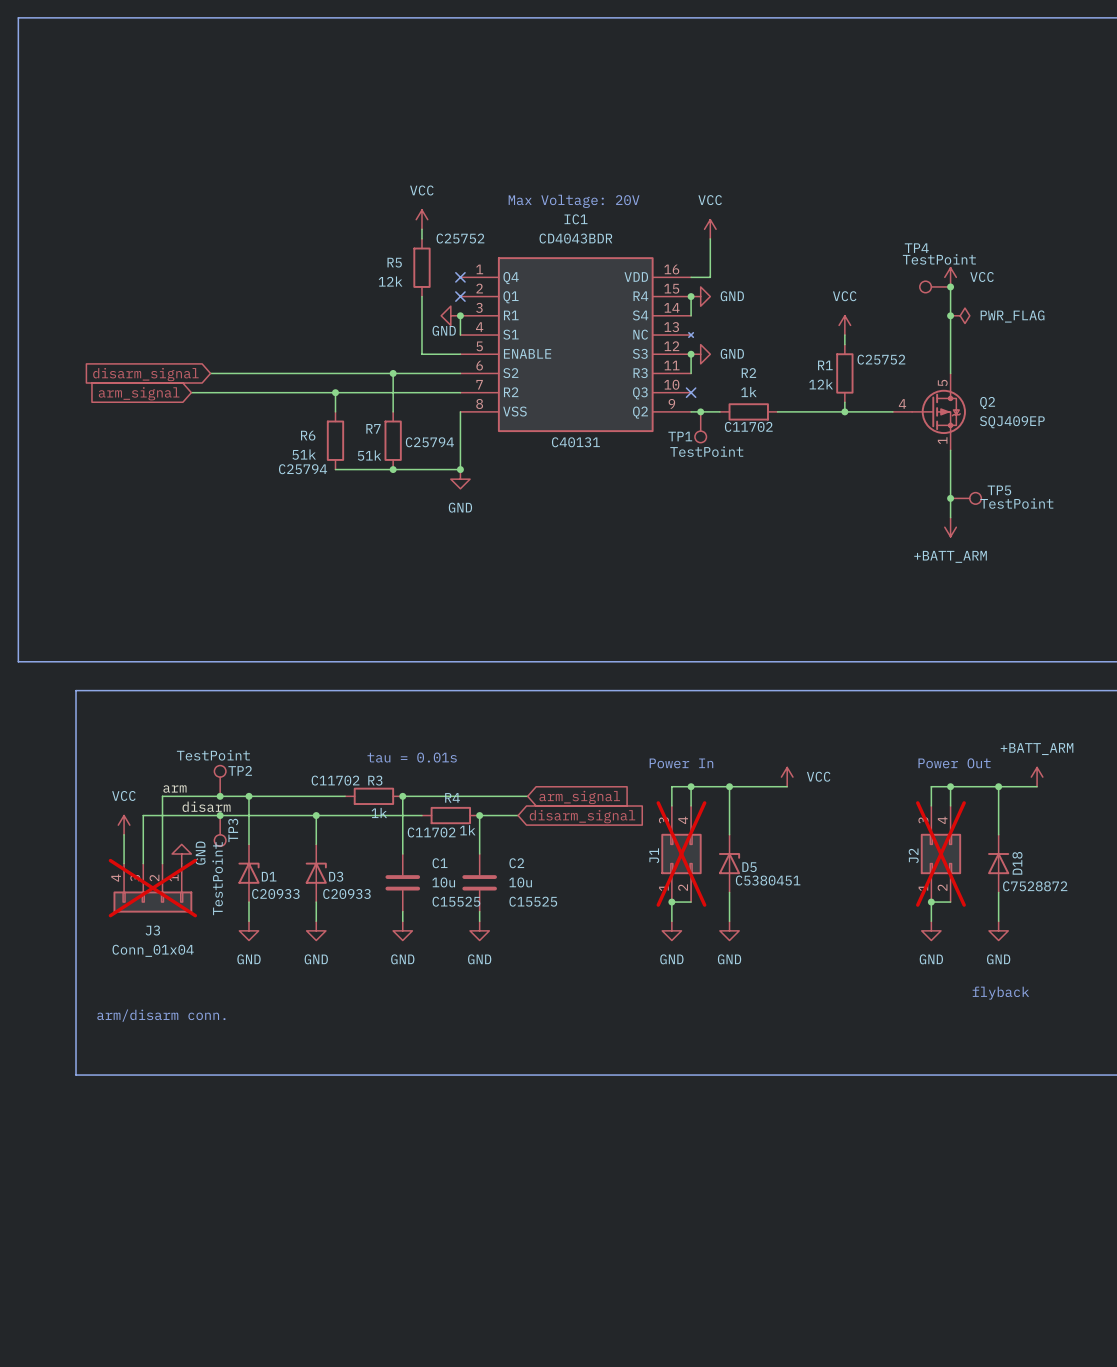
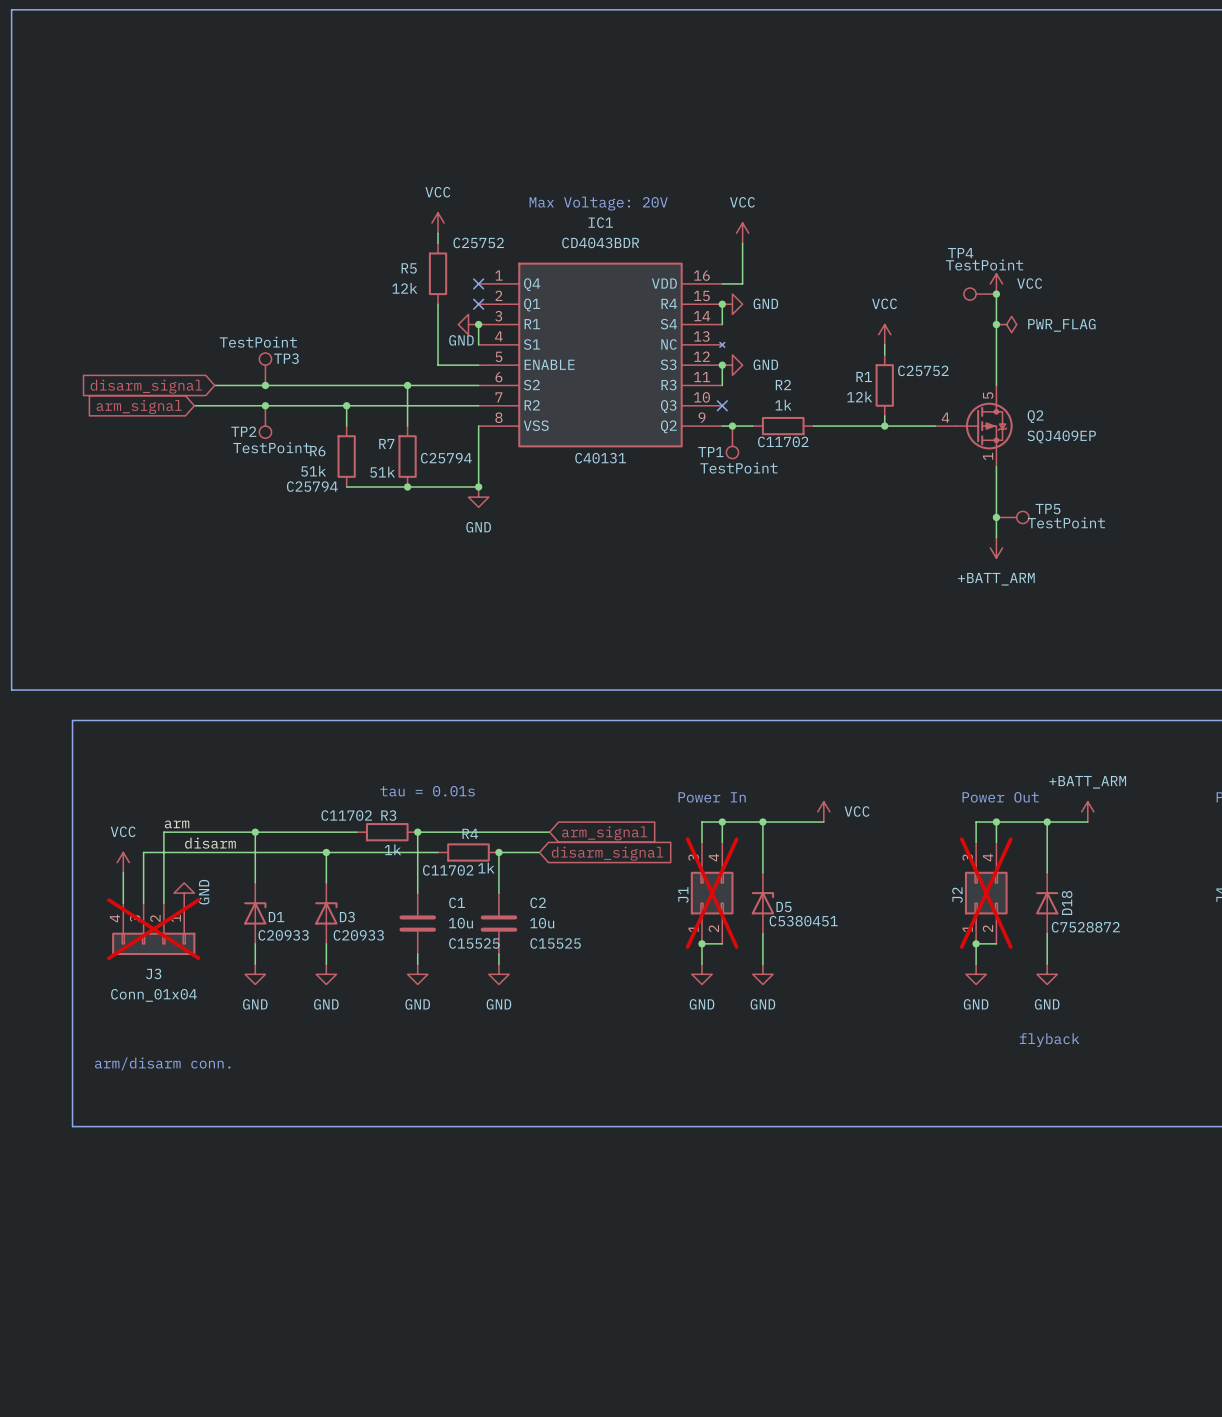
junction: none -> (265, 385)
junction: none -> (265, 405)
TP2 rotation: 0° (220, 771) -> 180° (265, 432)
TP2 position: (220, 780) -> (265, 422)
junction: (220, 796) -> none
junction: (220, 815) -> none
TP3 position: (220, 830) -> (265, 369)
TP3 rotation: 0° (220, 840) -> 180° (265, 359)
TP3 value position: TestPoint (217, 878) -> TestPoint (258, 342)

